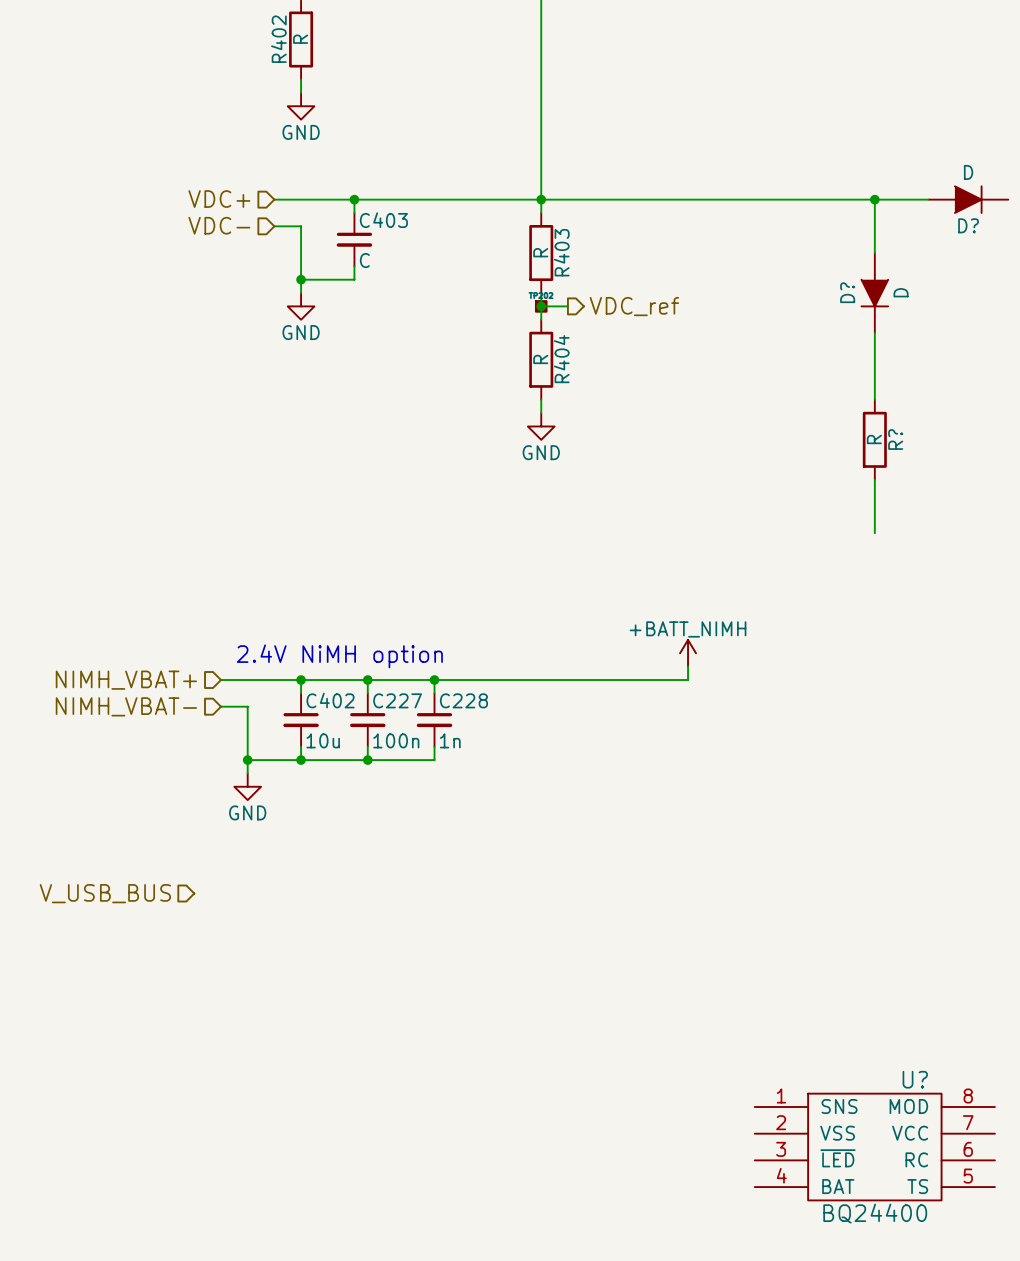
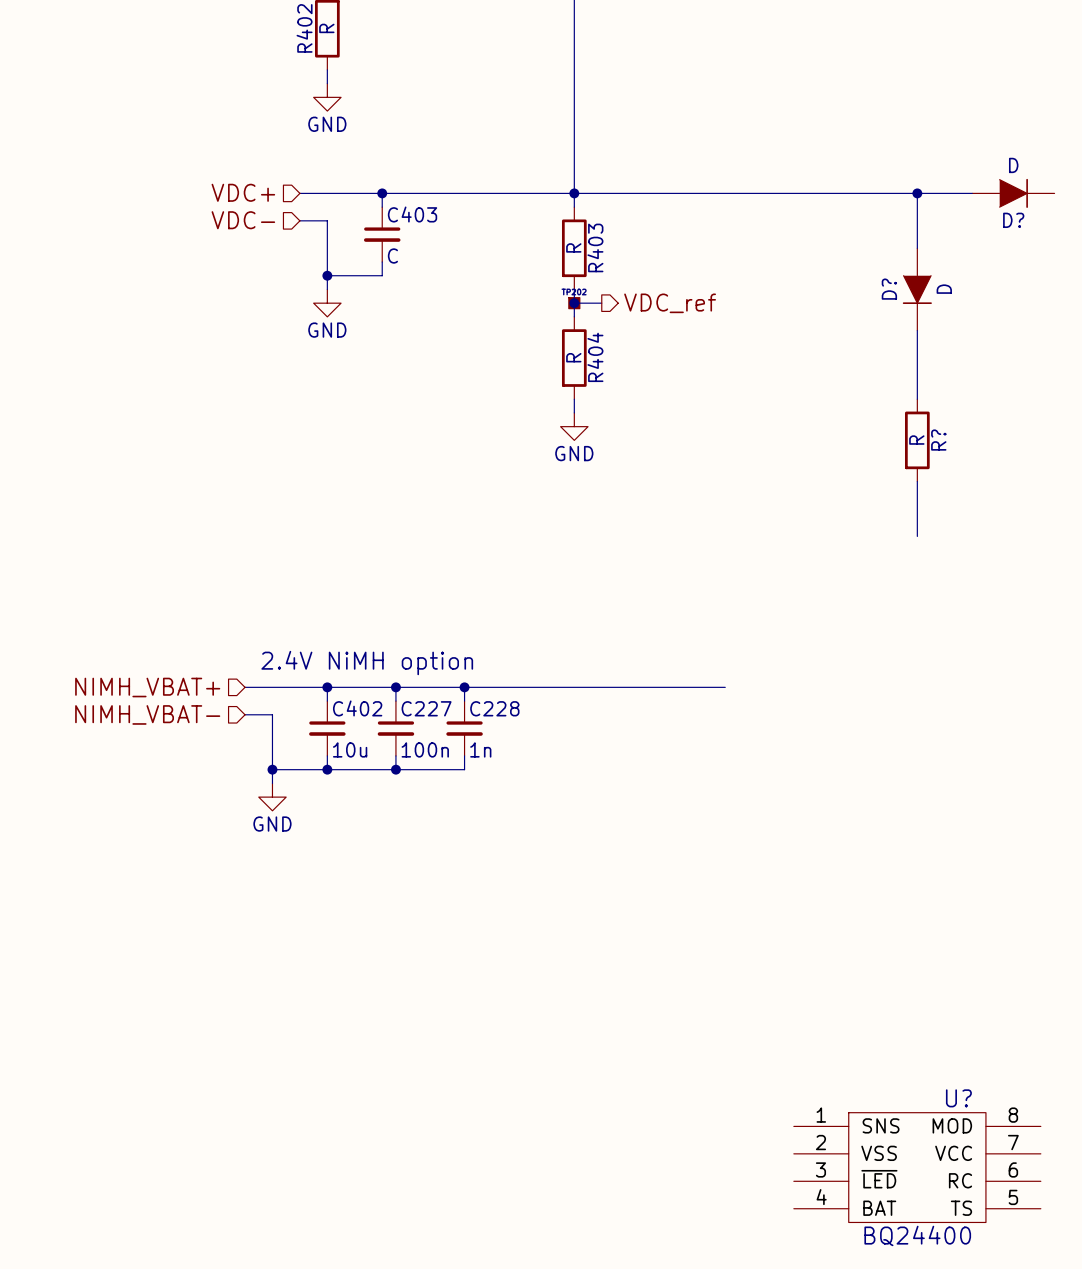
power symbol: +BATT_NIMH (688, 653) -> none
wire: (688, 666) (688, 680) -> none
hierarchical label: V_USB_BUS (105, 893) -> none

